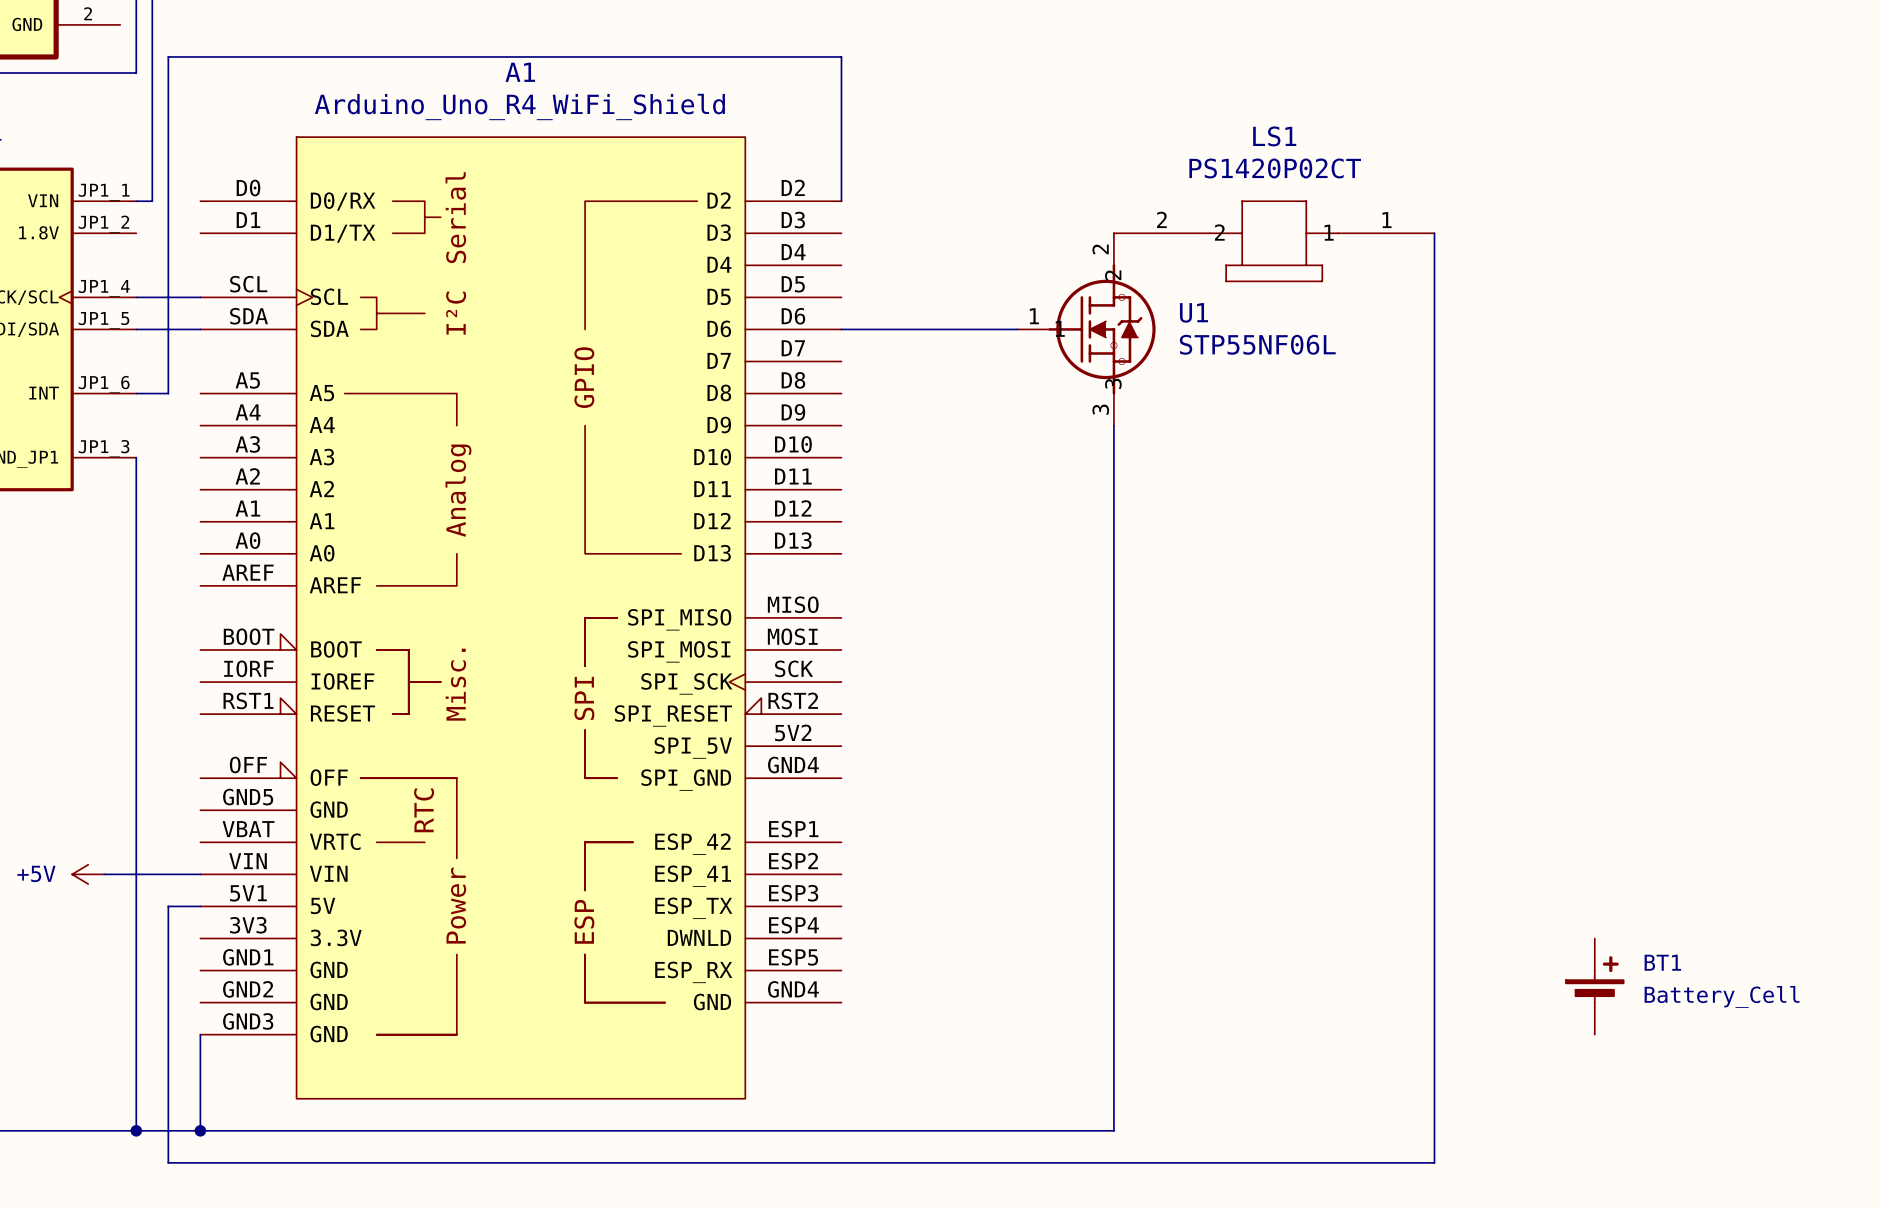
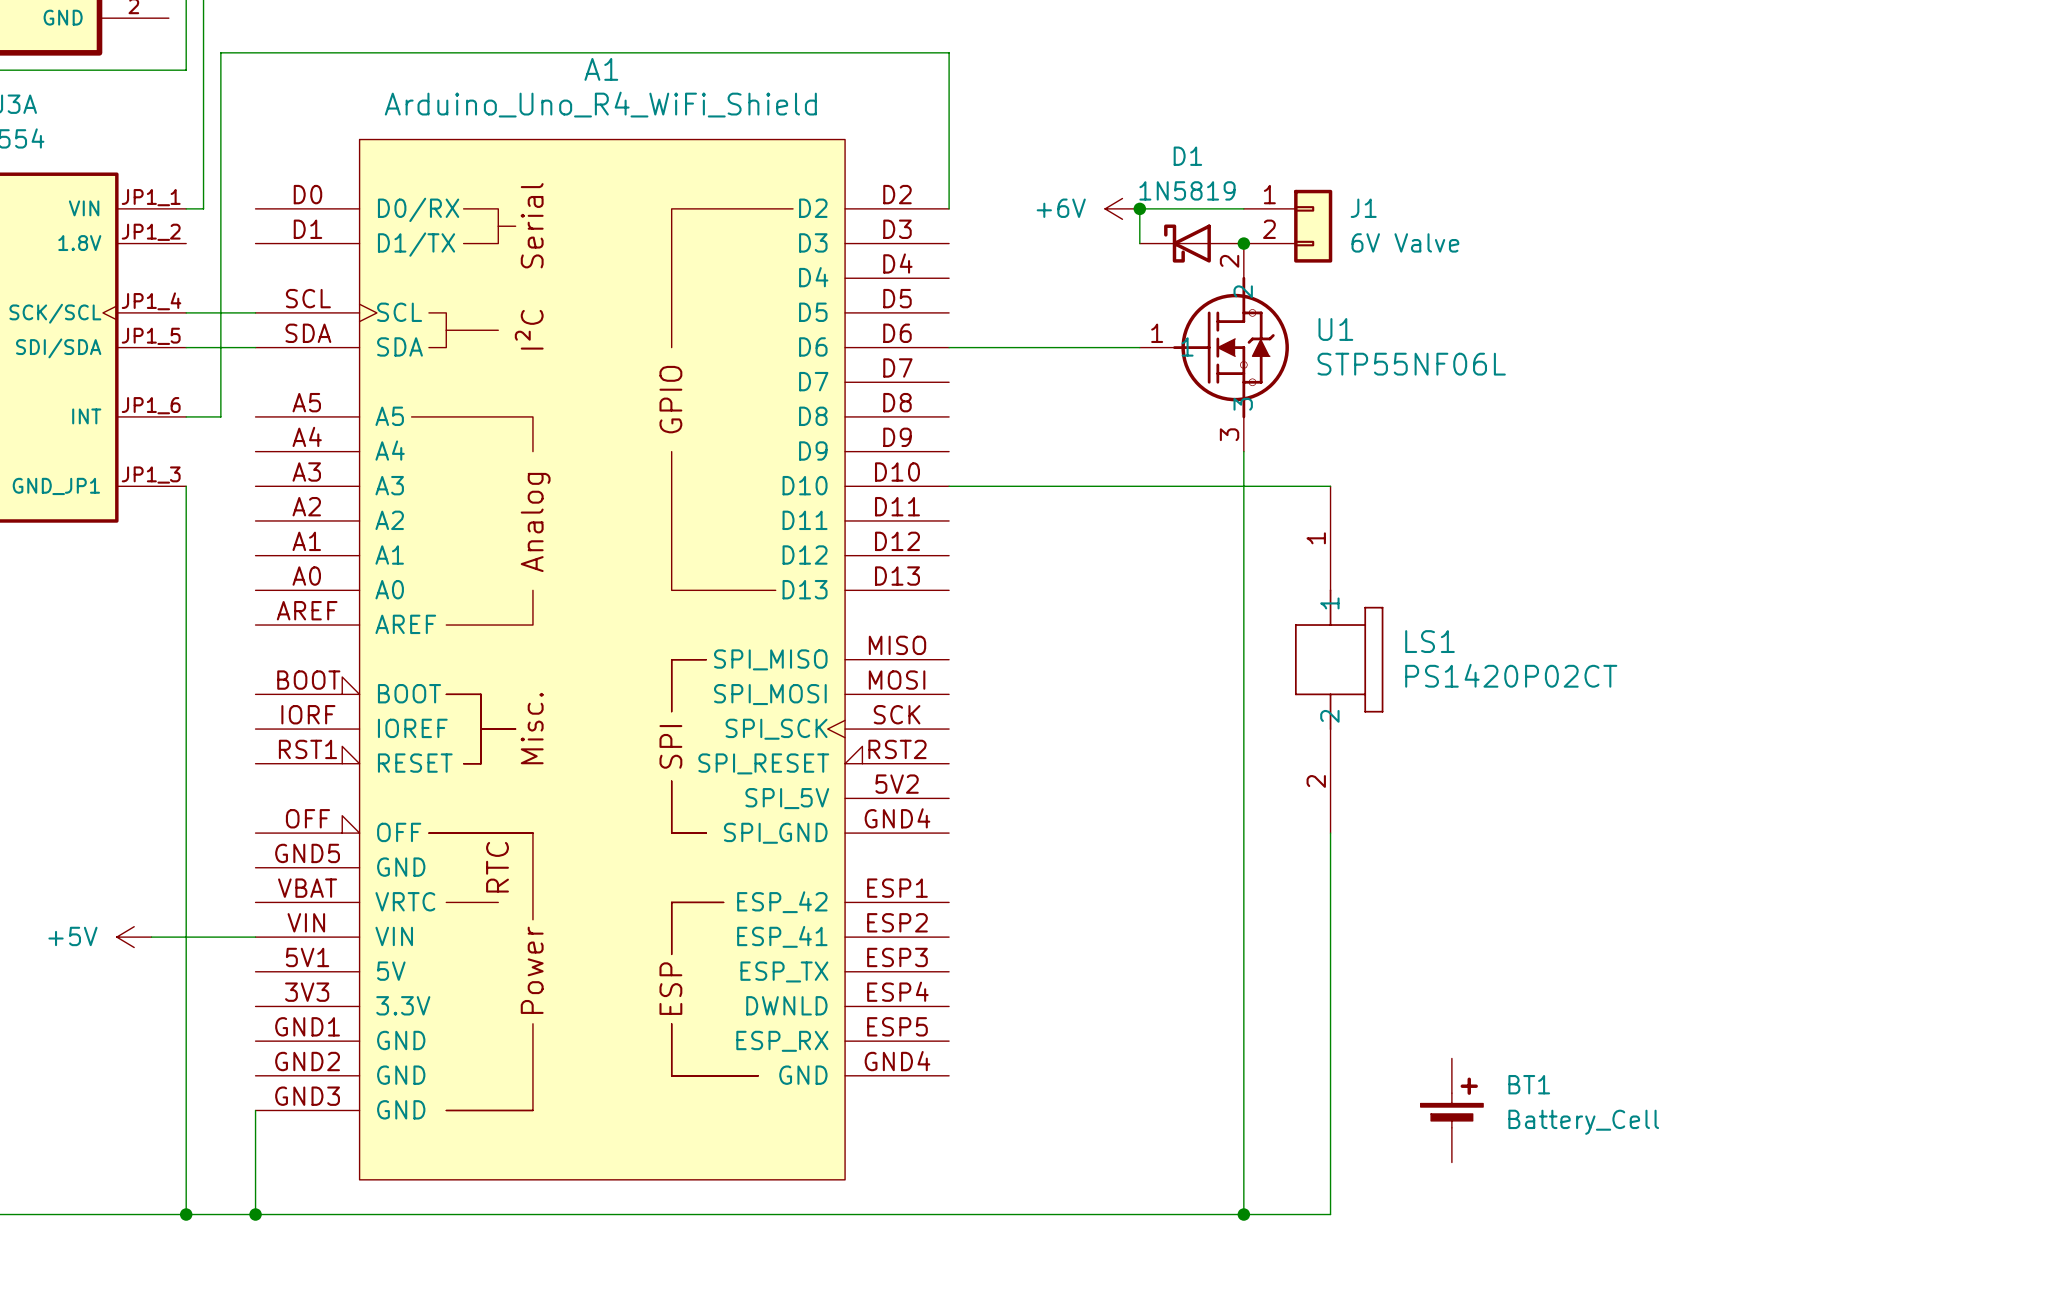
LS1 name position: LS1 (1274, 136) -> LS1 (1429, 641)
LS1 value position: PS1420P02CT (1275, 168) -> PS1420P02CT (1511, 675)
power symbol: none -> +6V (1122, 208)
junction: none -> (1139, 208)
wire: none -> (1243, 208) (1139, 208) (1139, 243)
J1: none -> 6V Valve (1288, 226)
D1: none -> 1N5819 (1191, 243)
junction: none -> (1243, 243)
wire: (1434, 233) (1434, 1162) (168, 1162) (168, 906) (200, 906) -> none
LS1 rotation: 0° (1274, 241) -> 90° counterclockwise (1339, 659)
LS1 position: (1274, 241) -> (1339, 659)
wire: none -> (949, 486) (1330, 486)
wire: none -> (1330, 833) (1330, 1214) (1243, 1214)
BT1 position: (1594, 986) -> (1451, 1110)
junction: none -> (1243, 1214)

